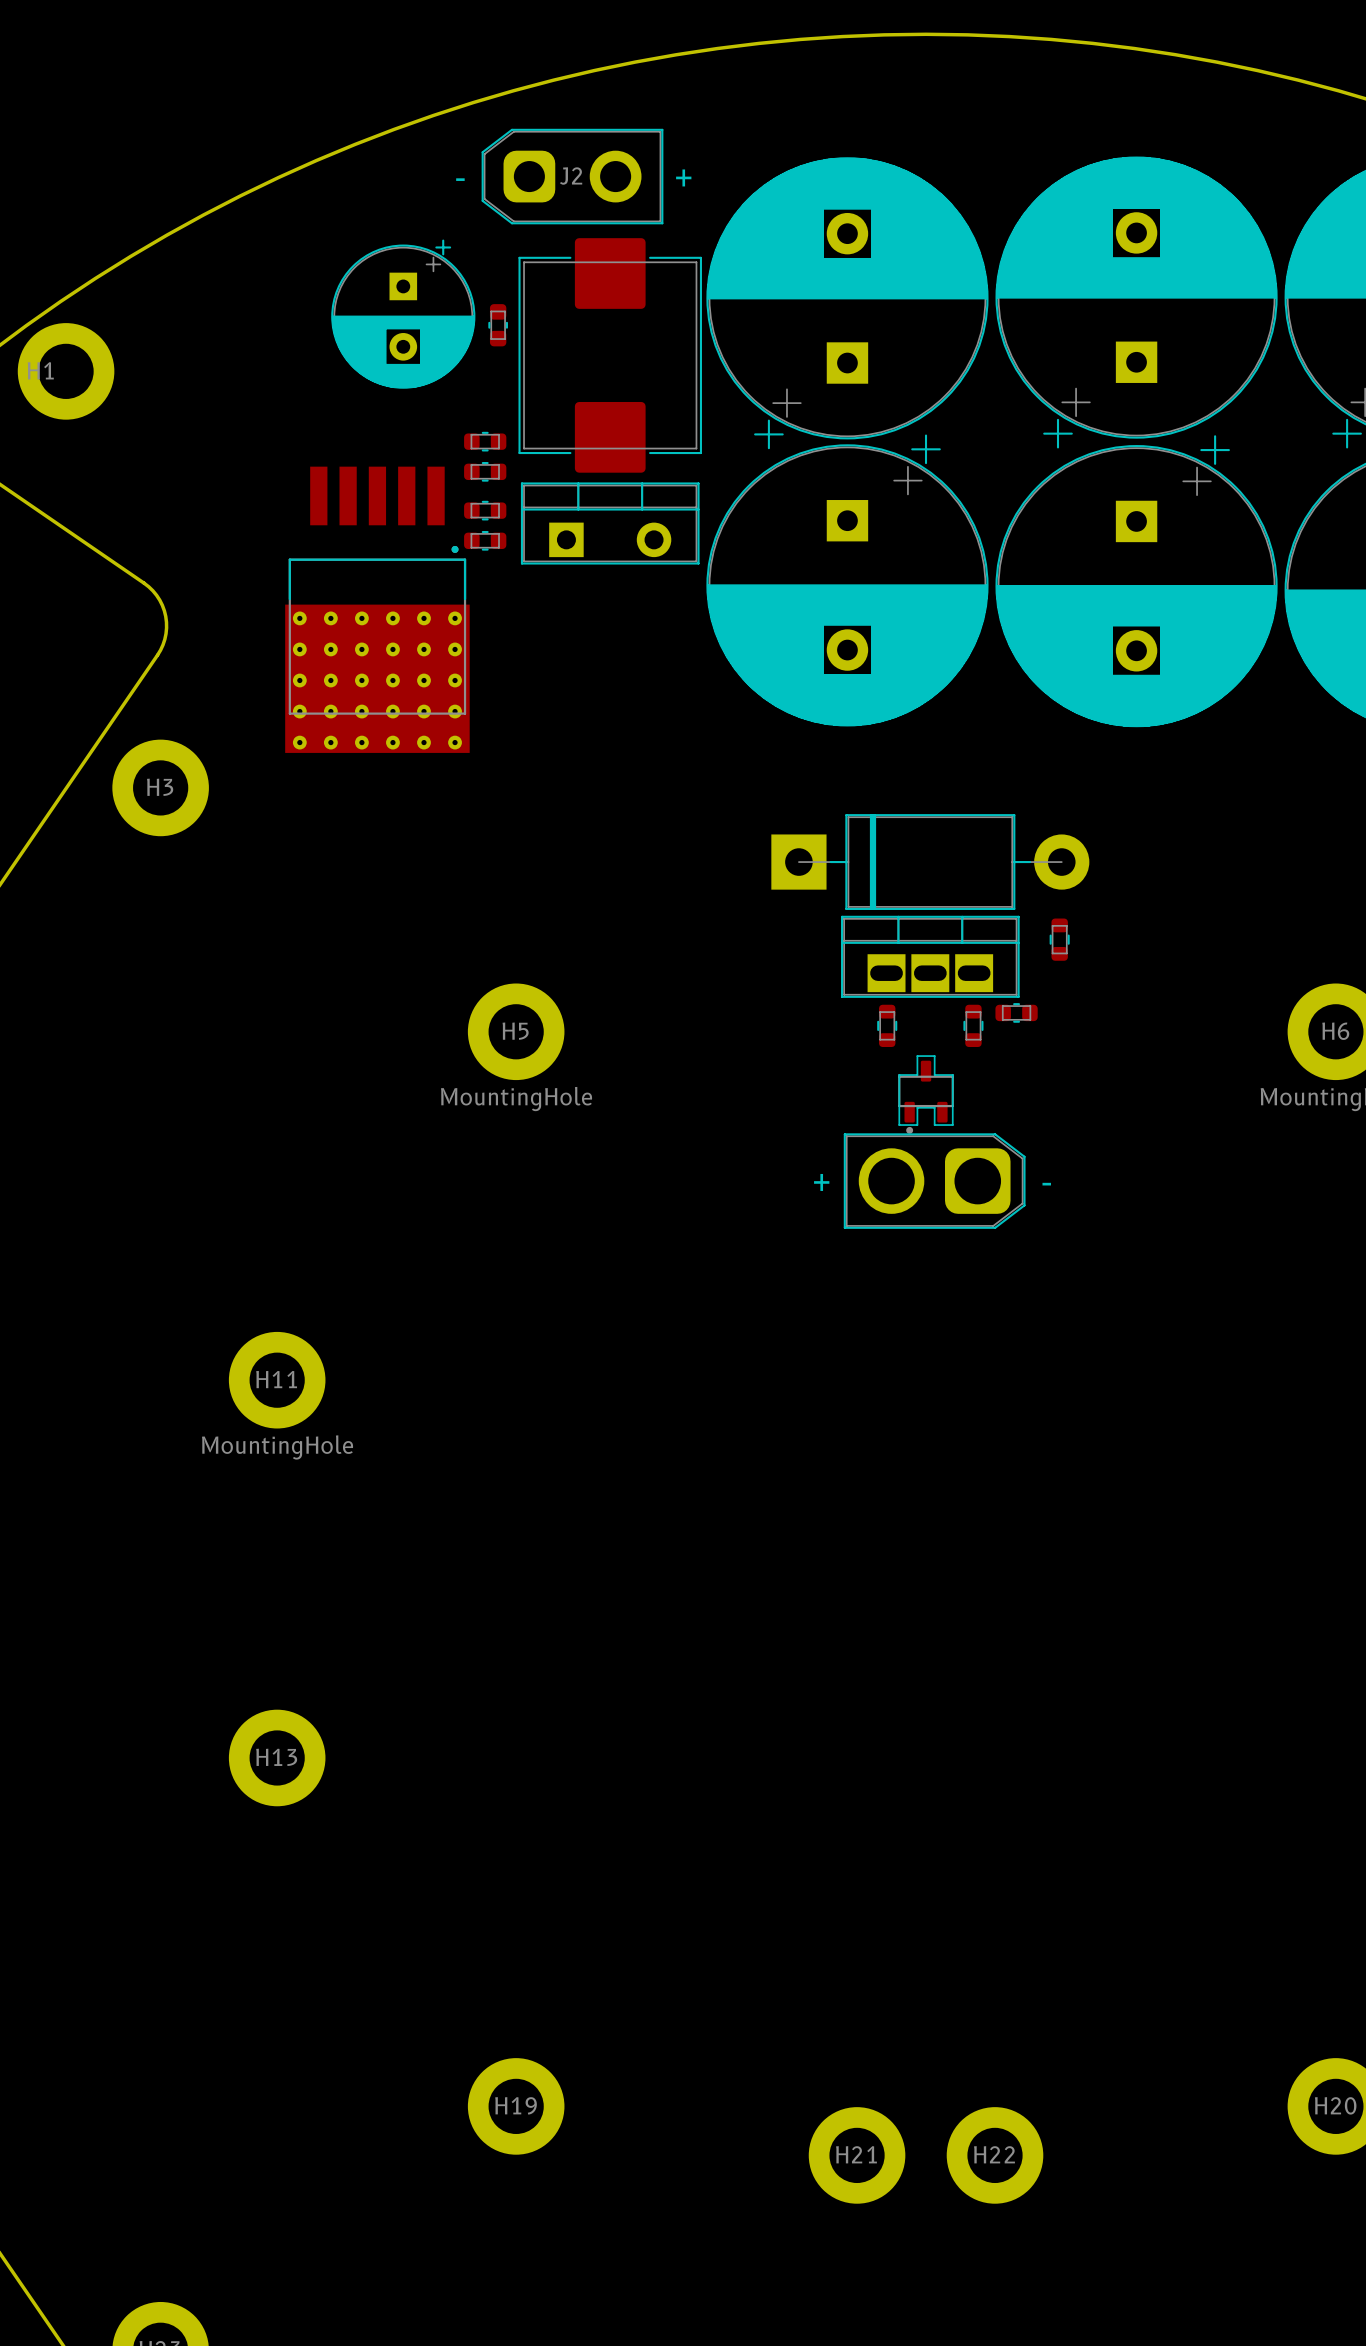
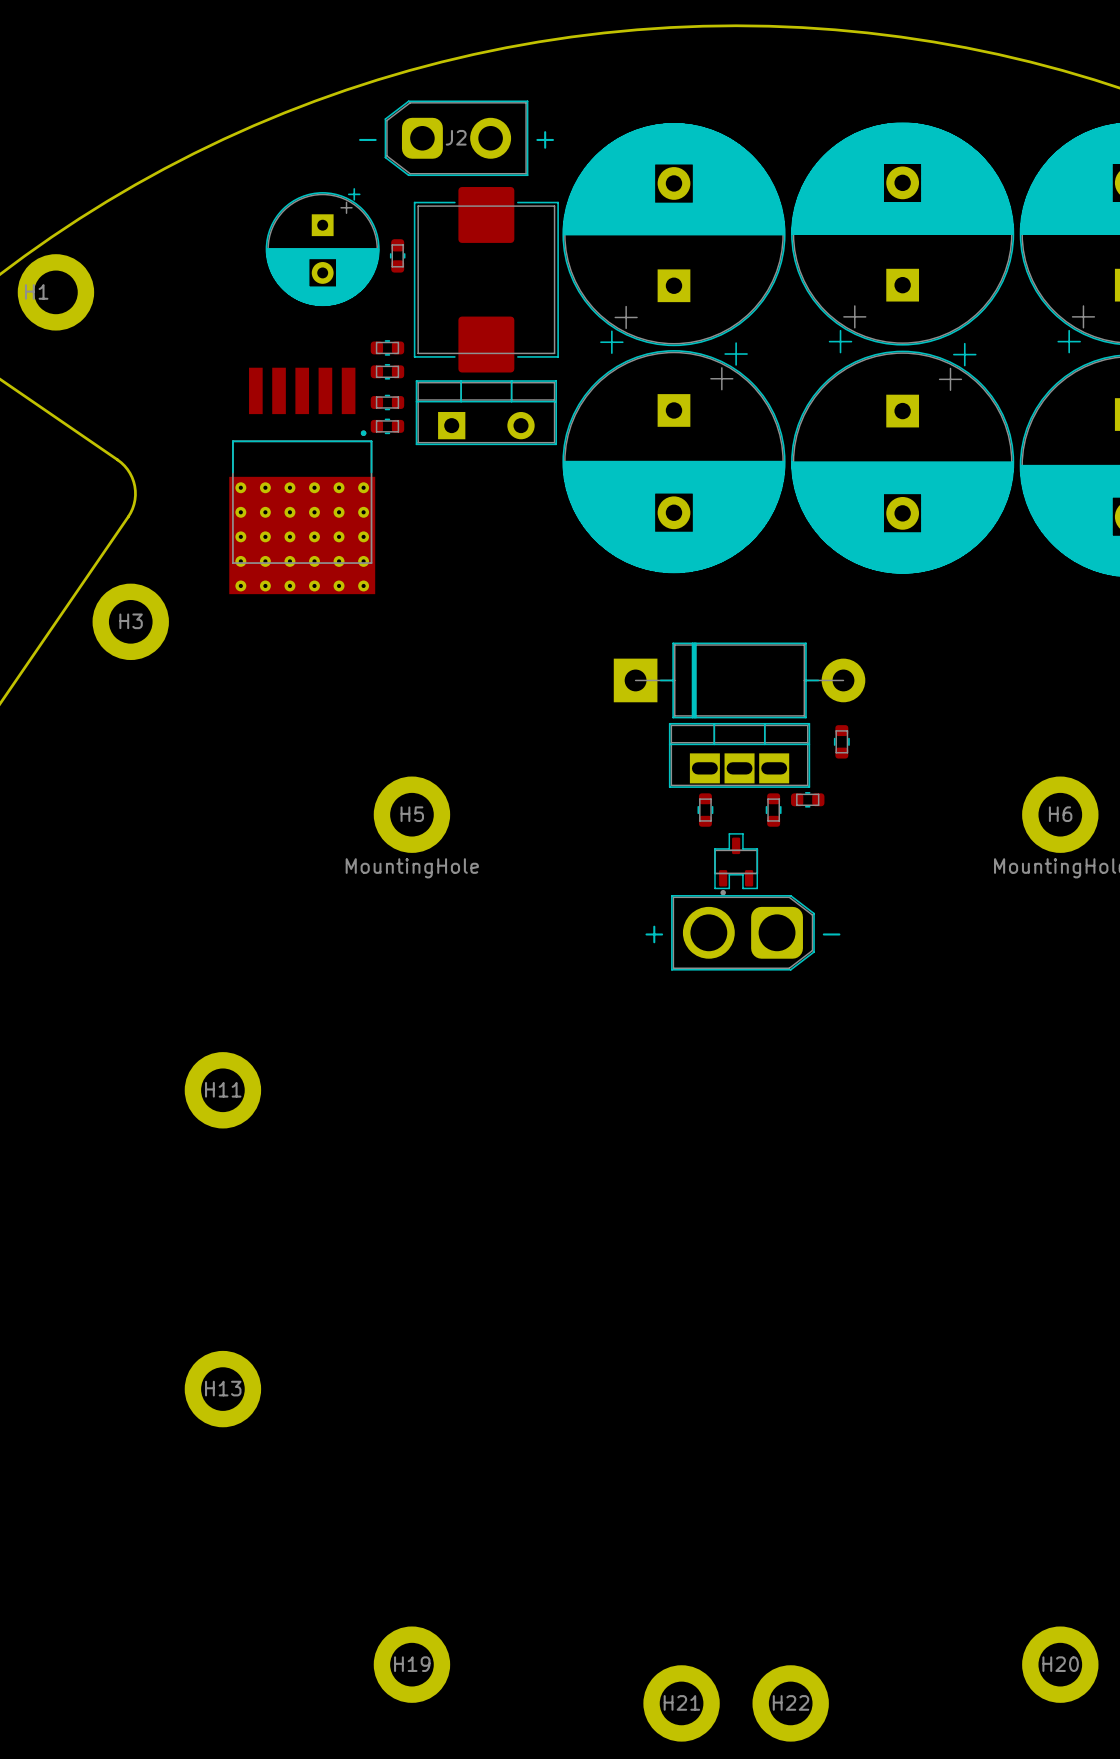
H11 value: MountingHole (277, 1447) -> none

